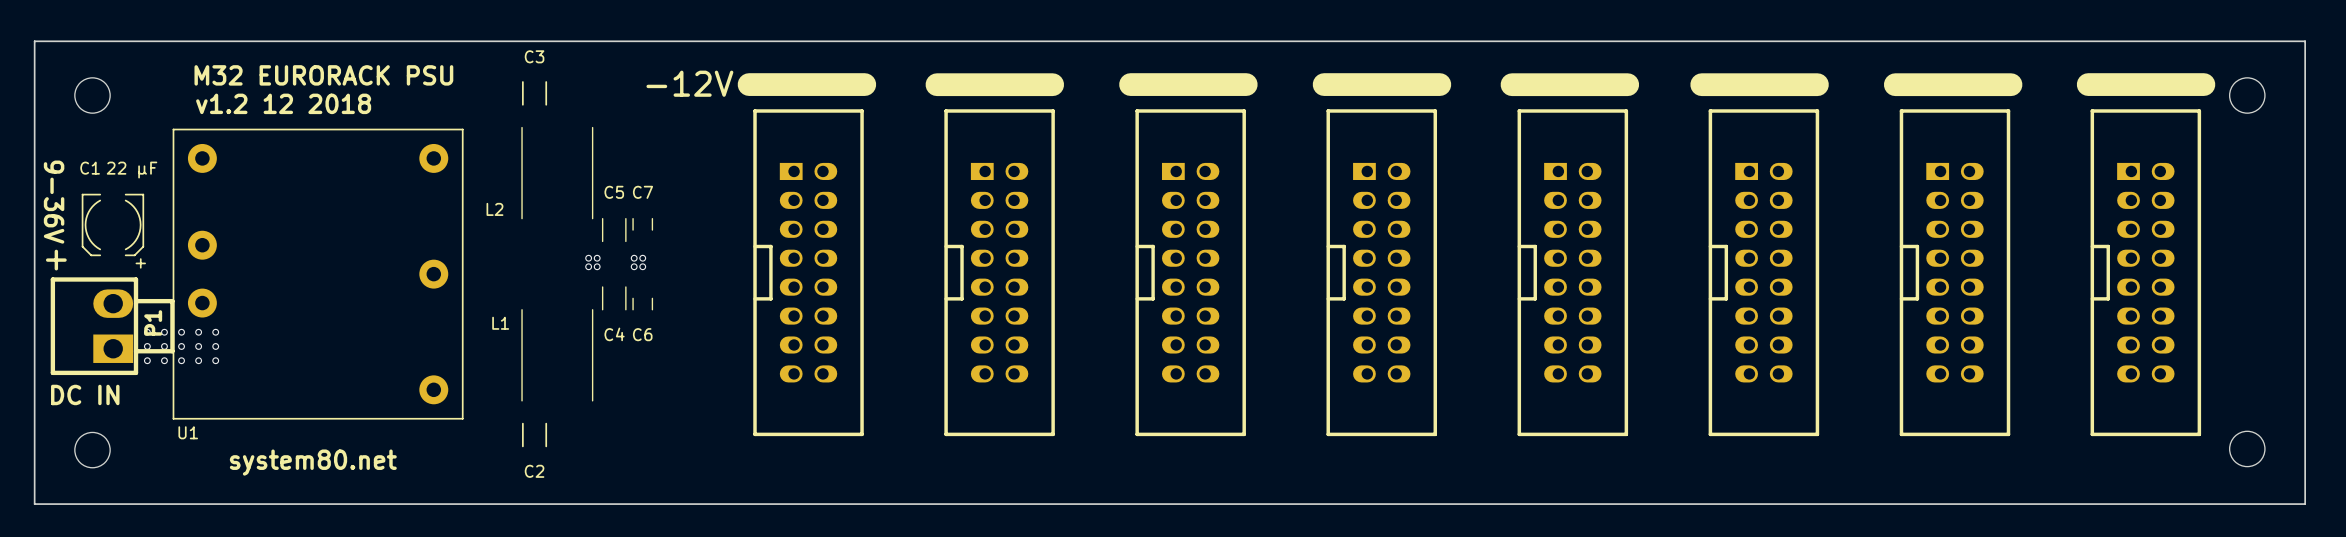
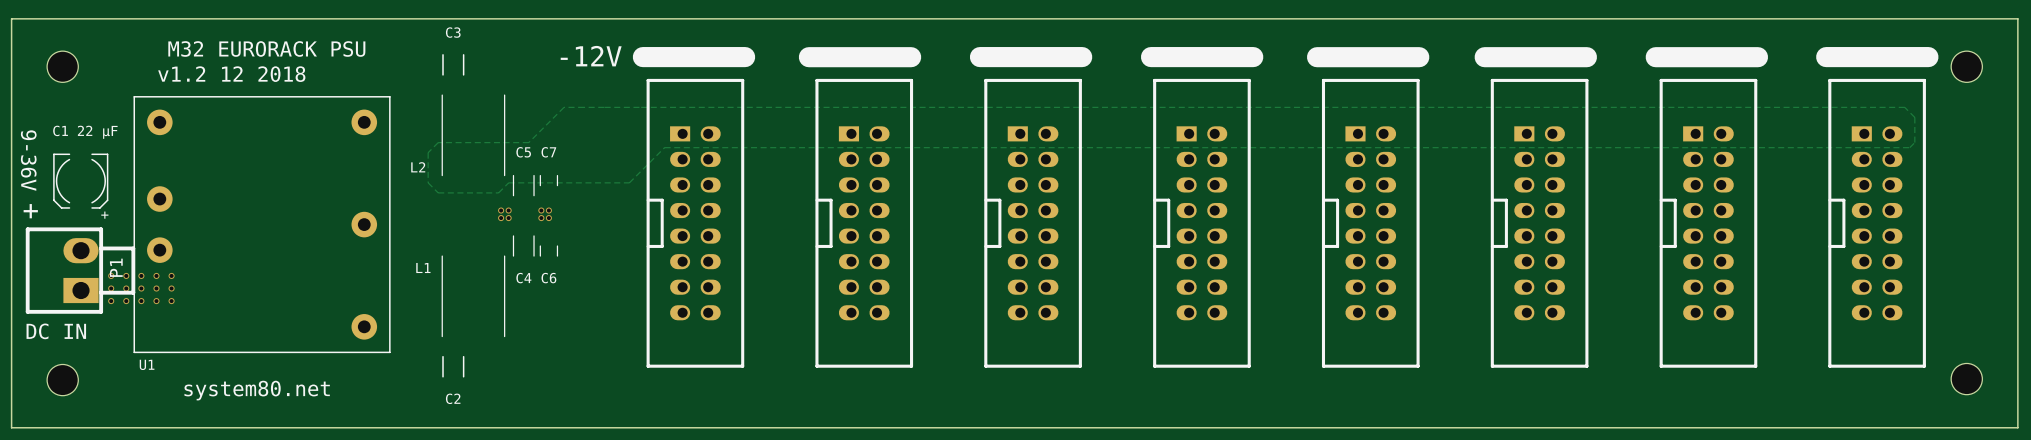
zone outline: none -> (564, 107) (1904, 107) (1914, 117) (1914, 142) (1909, 147) (664, 147) (629, 182) (508, 182) (498, 192) (438, 192) (428, 182) (428, 152) (438, 142) (528, 142) (564, 107)

